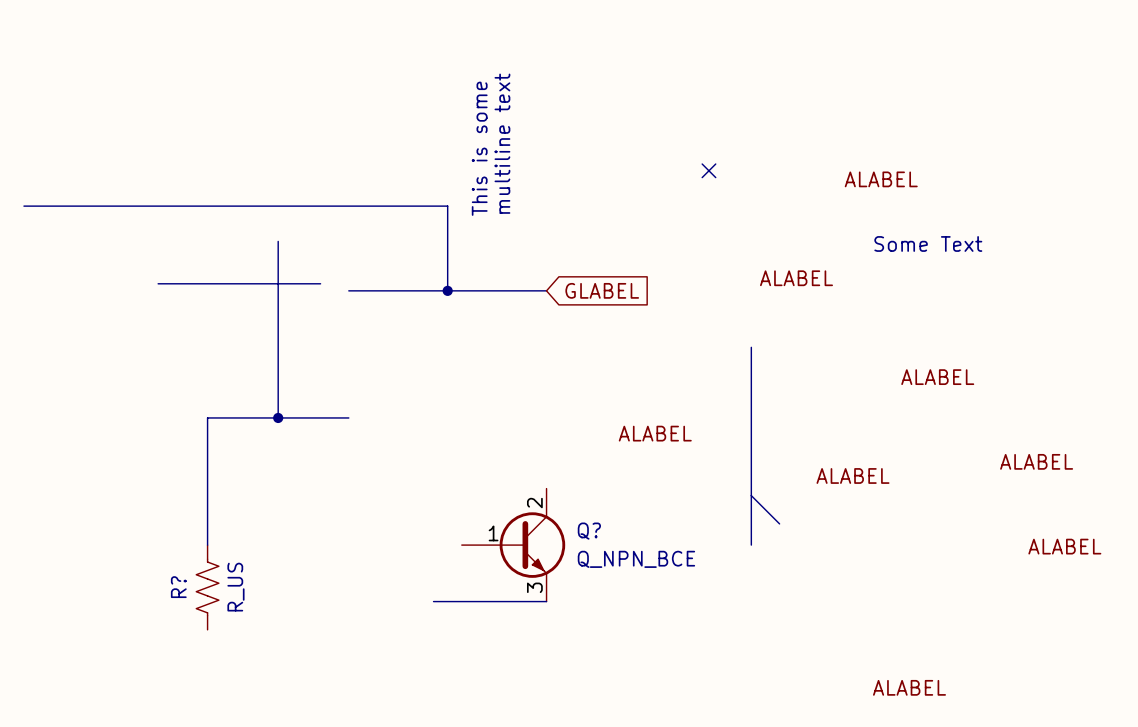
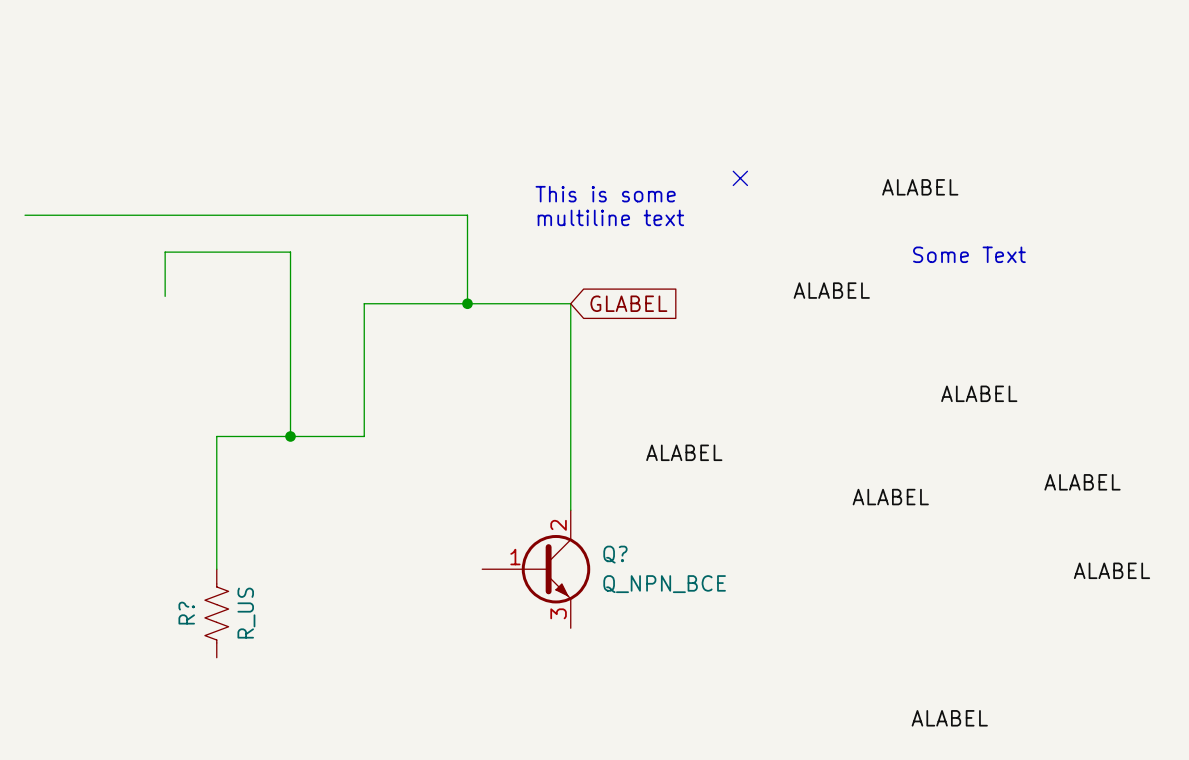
text rotation: 0° (502, 143) -> 90° clockwise (610, 217)
text rotation: 0° (479, 148) -> 90° clockwise (605, 194)
wire: (158, 283) (320, 283) -> (165, 296) (165, 252) (290, 252)
wire: none -> (364, 303) (364, 436)
wire: none -> (570, 303) (570, 510)
bus: (751, 347) (751, 545) -> none
wire: (751, 495) (779, 523) -> none
wire: (433, 601) (546, 601) -> none

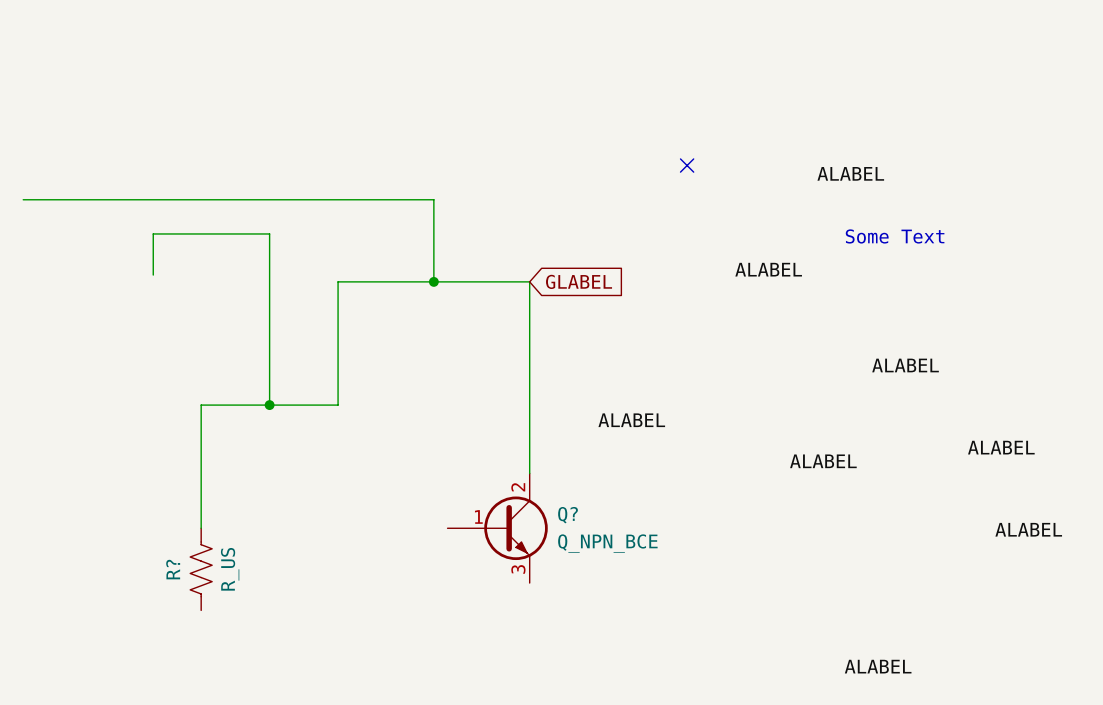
text: This is some (605, 194) -> none
text: multiline text (610, 217) -> none

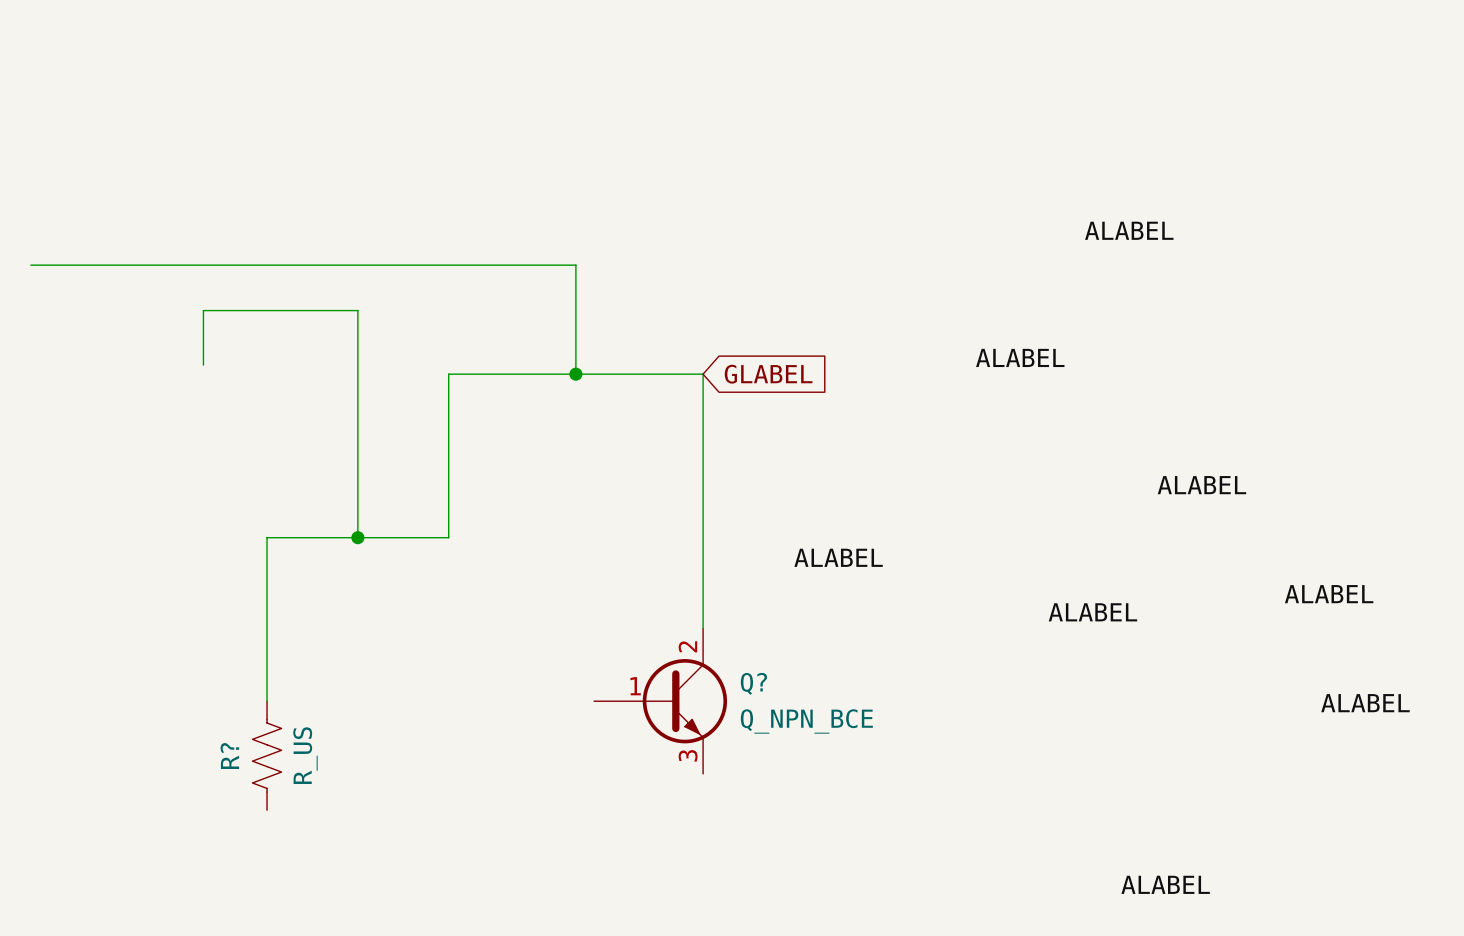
no-connect mark: (687, 165) -> none
text: Some Text (895, 236) -> none

